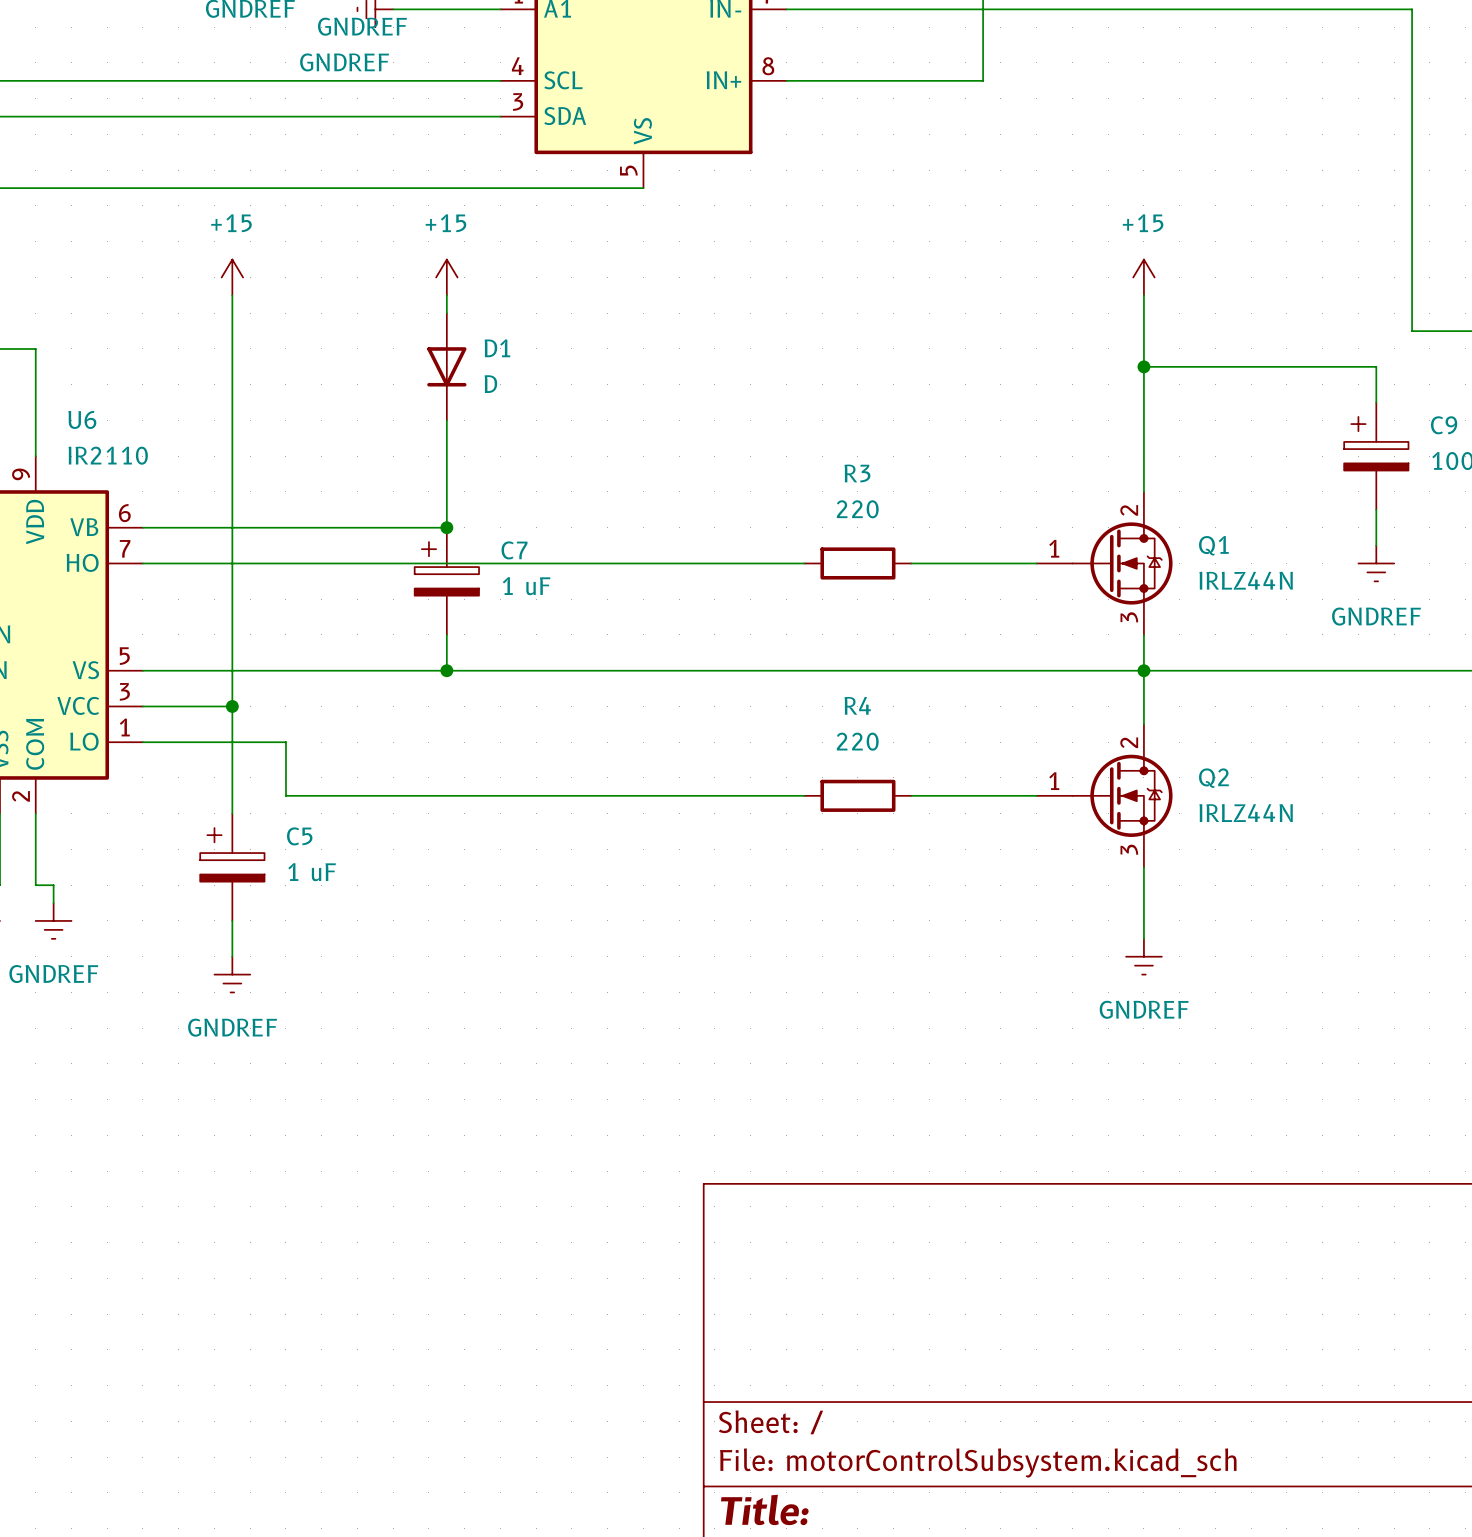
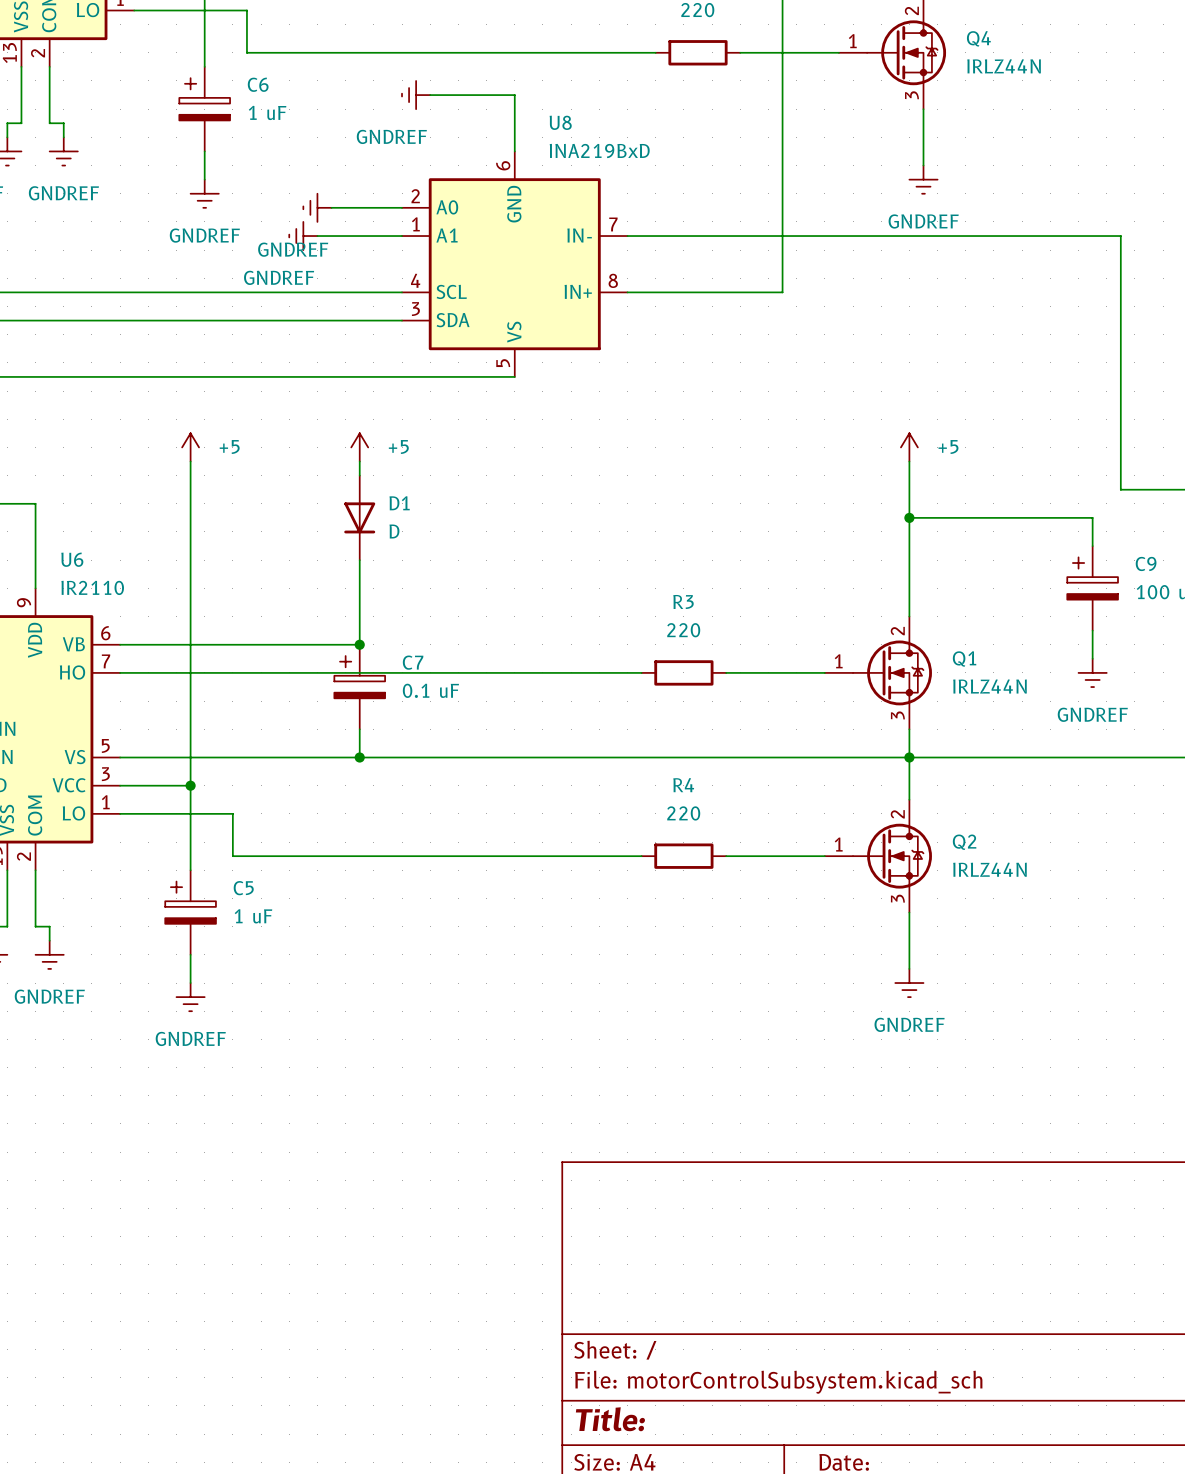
power symbol: +15 (232, 277) -> +5 (190, 447)
power symbol: +15 (446, 277) -> +5 (359, 447)
power symbol: +15 (1143, 277) -> +5 (909, 447)
C7 value: 1 uF (526, 586) -> 0.1 uF (430, 690)

